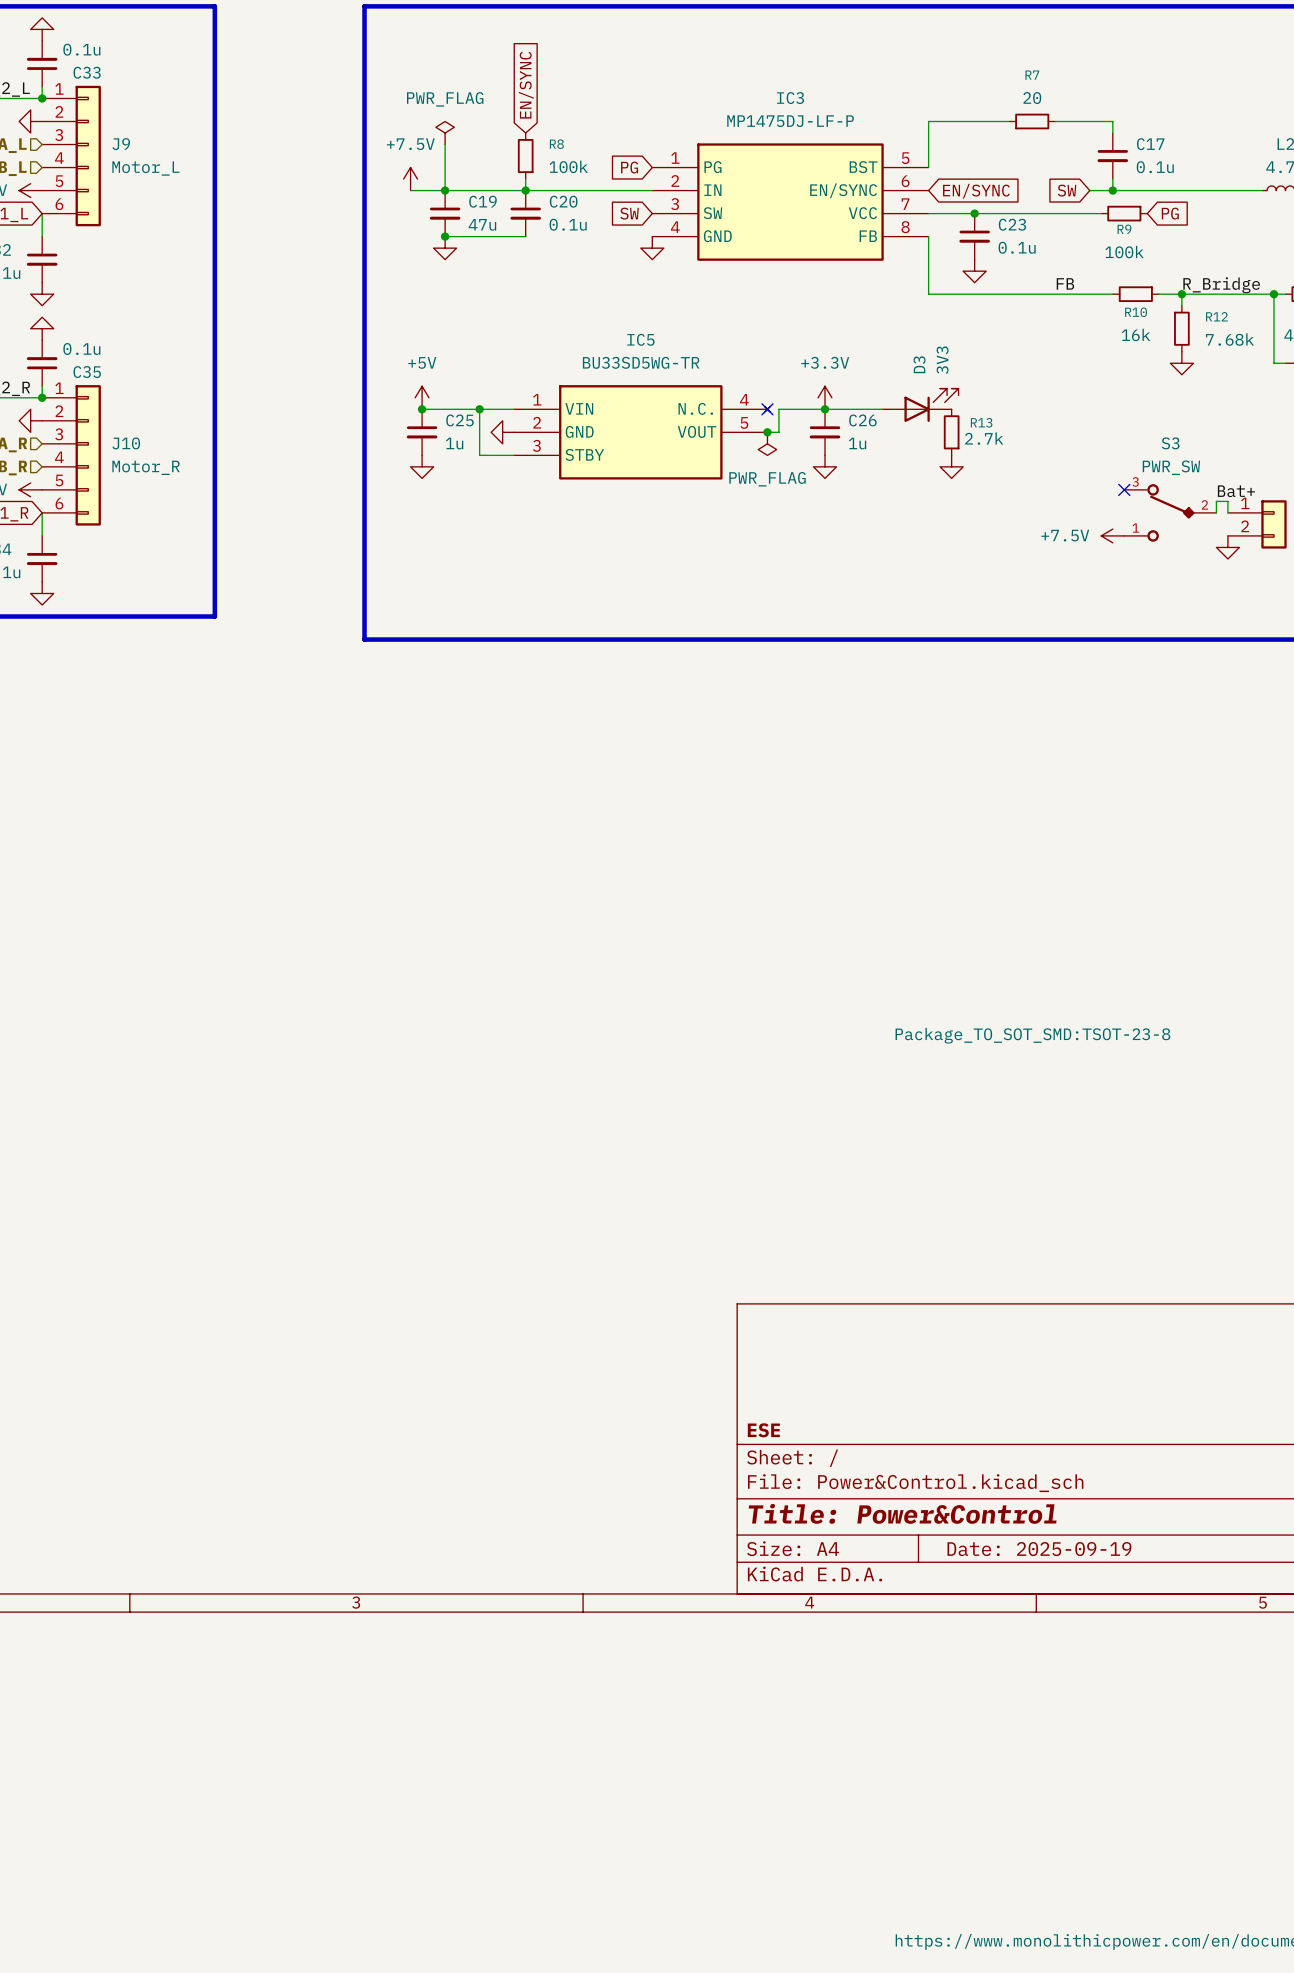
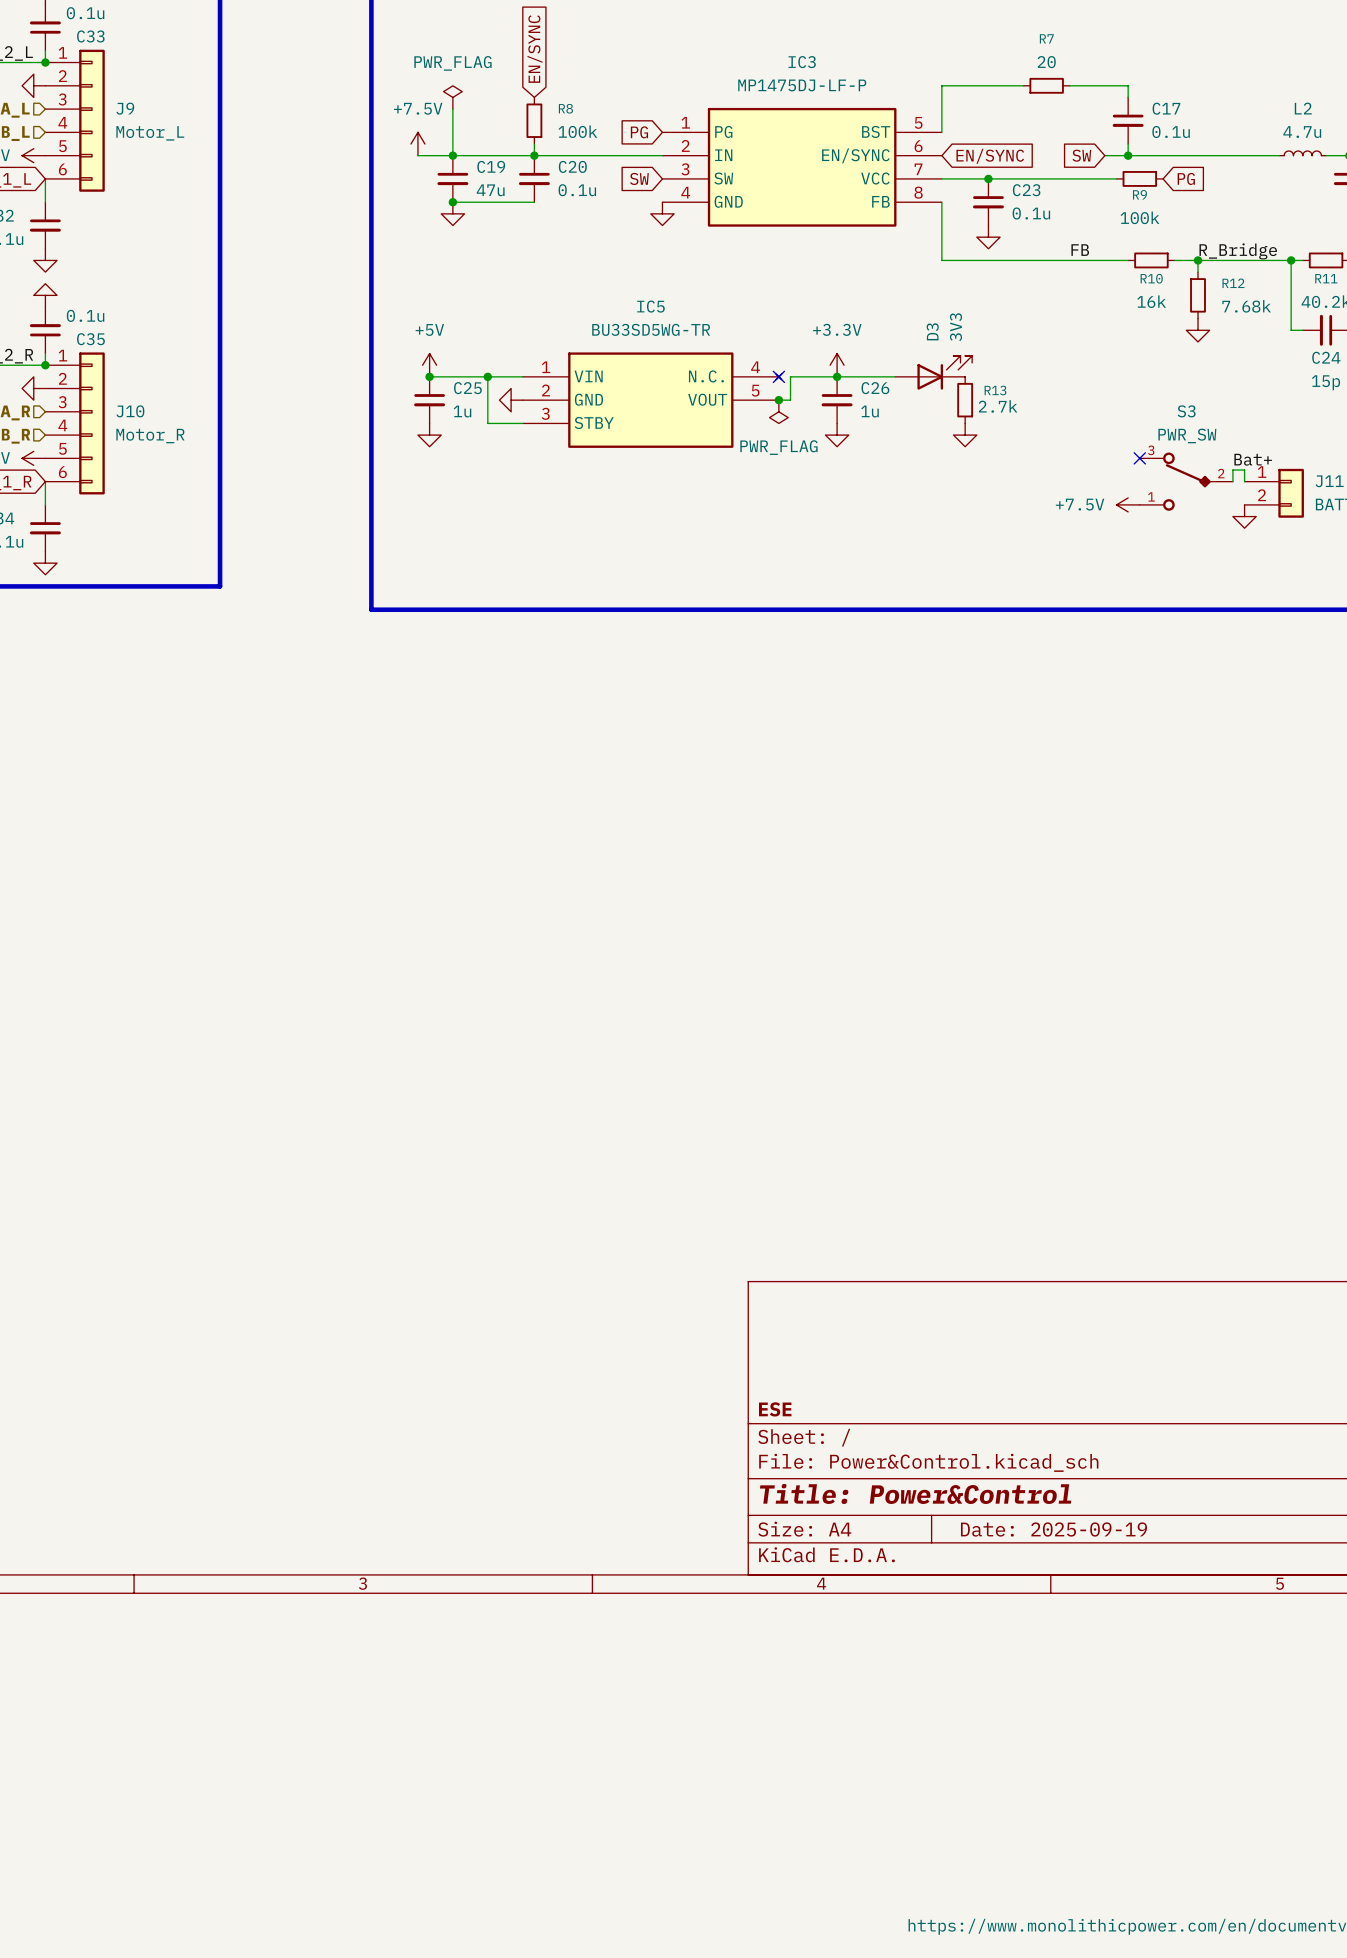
IC3 text: Package_TO_SOT_SMD:TSOT-23-8 (1032, 1035) -> none

